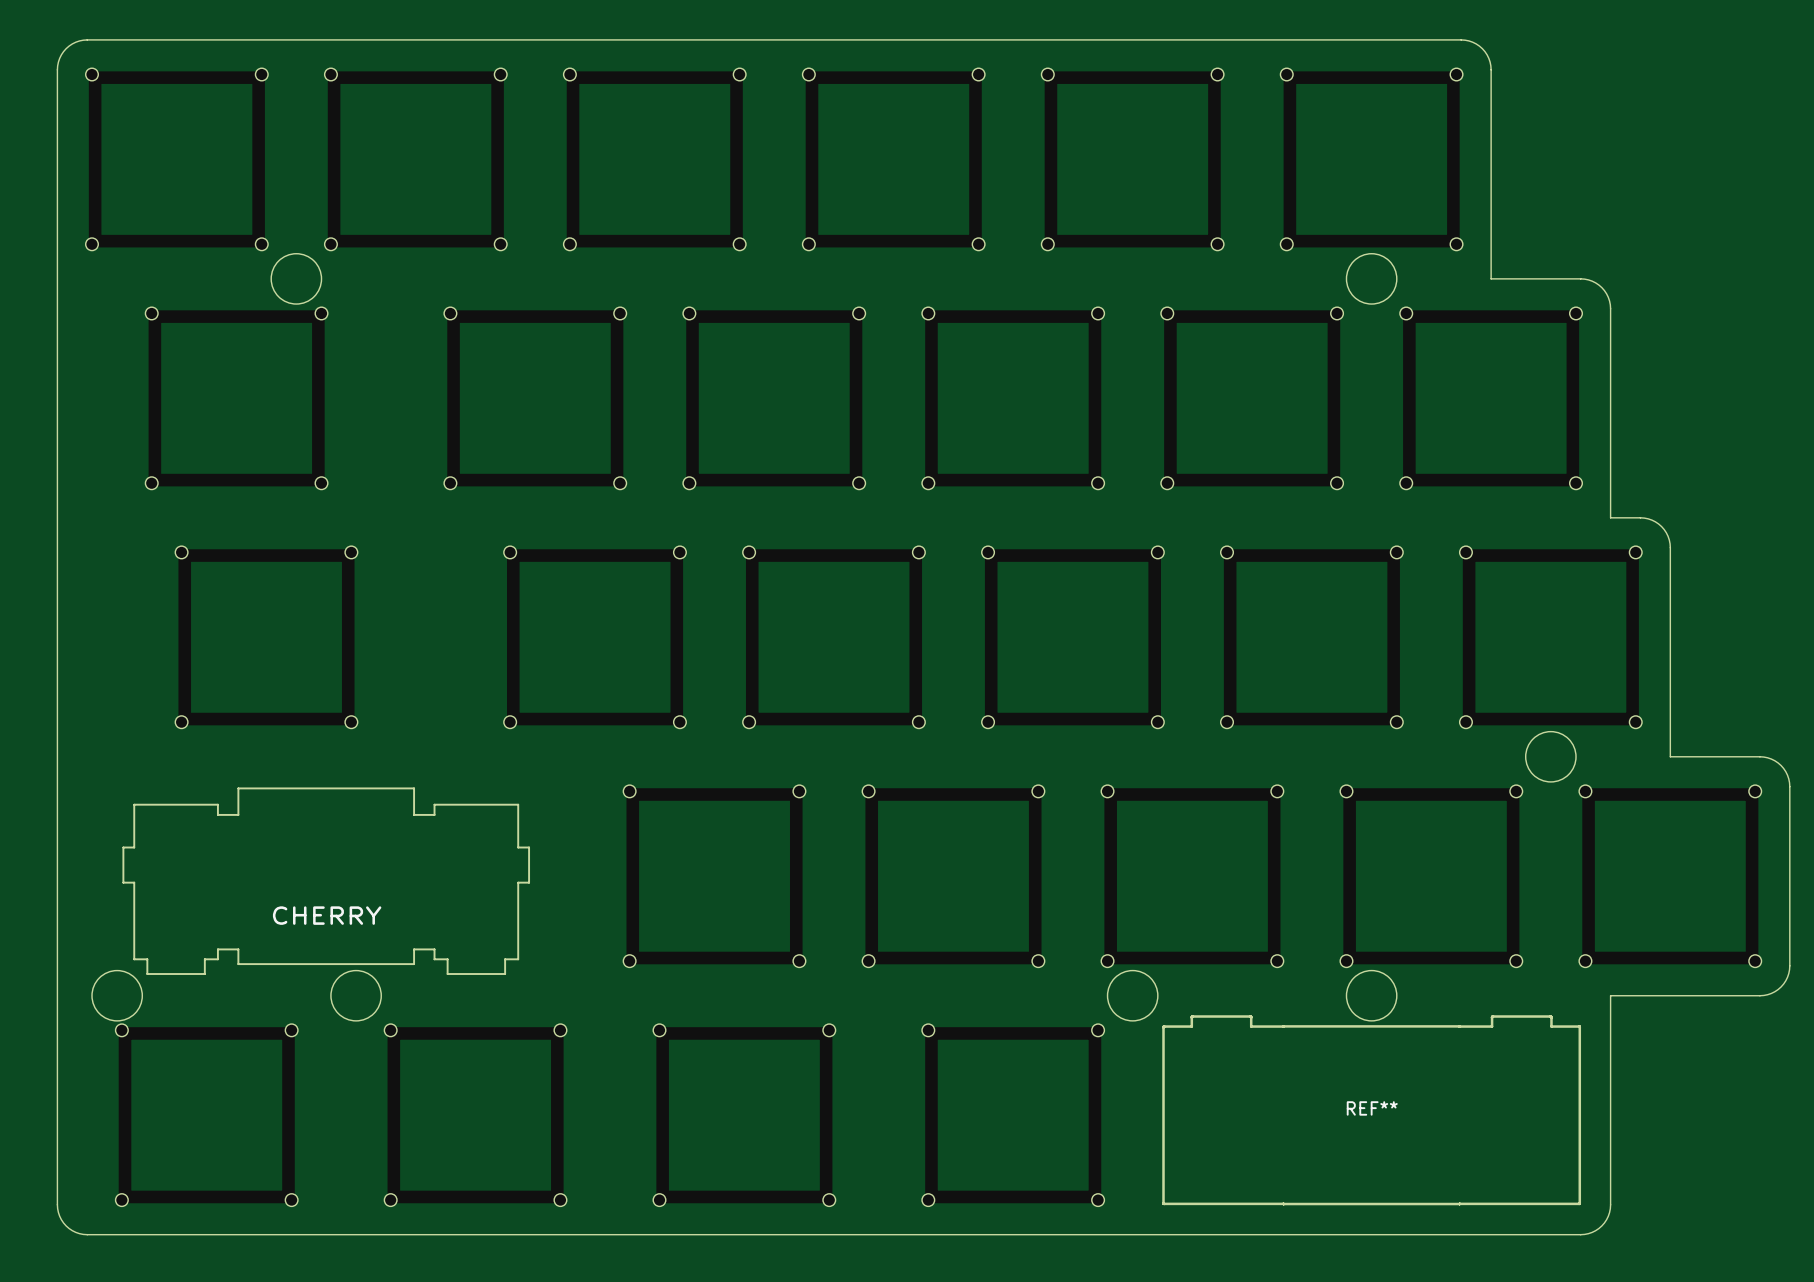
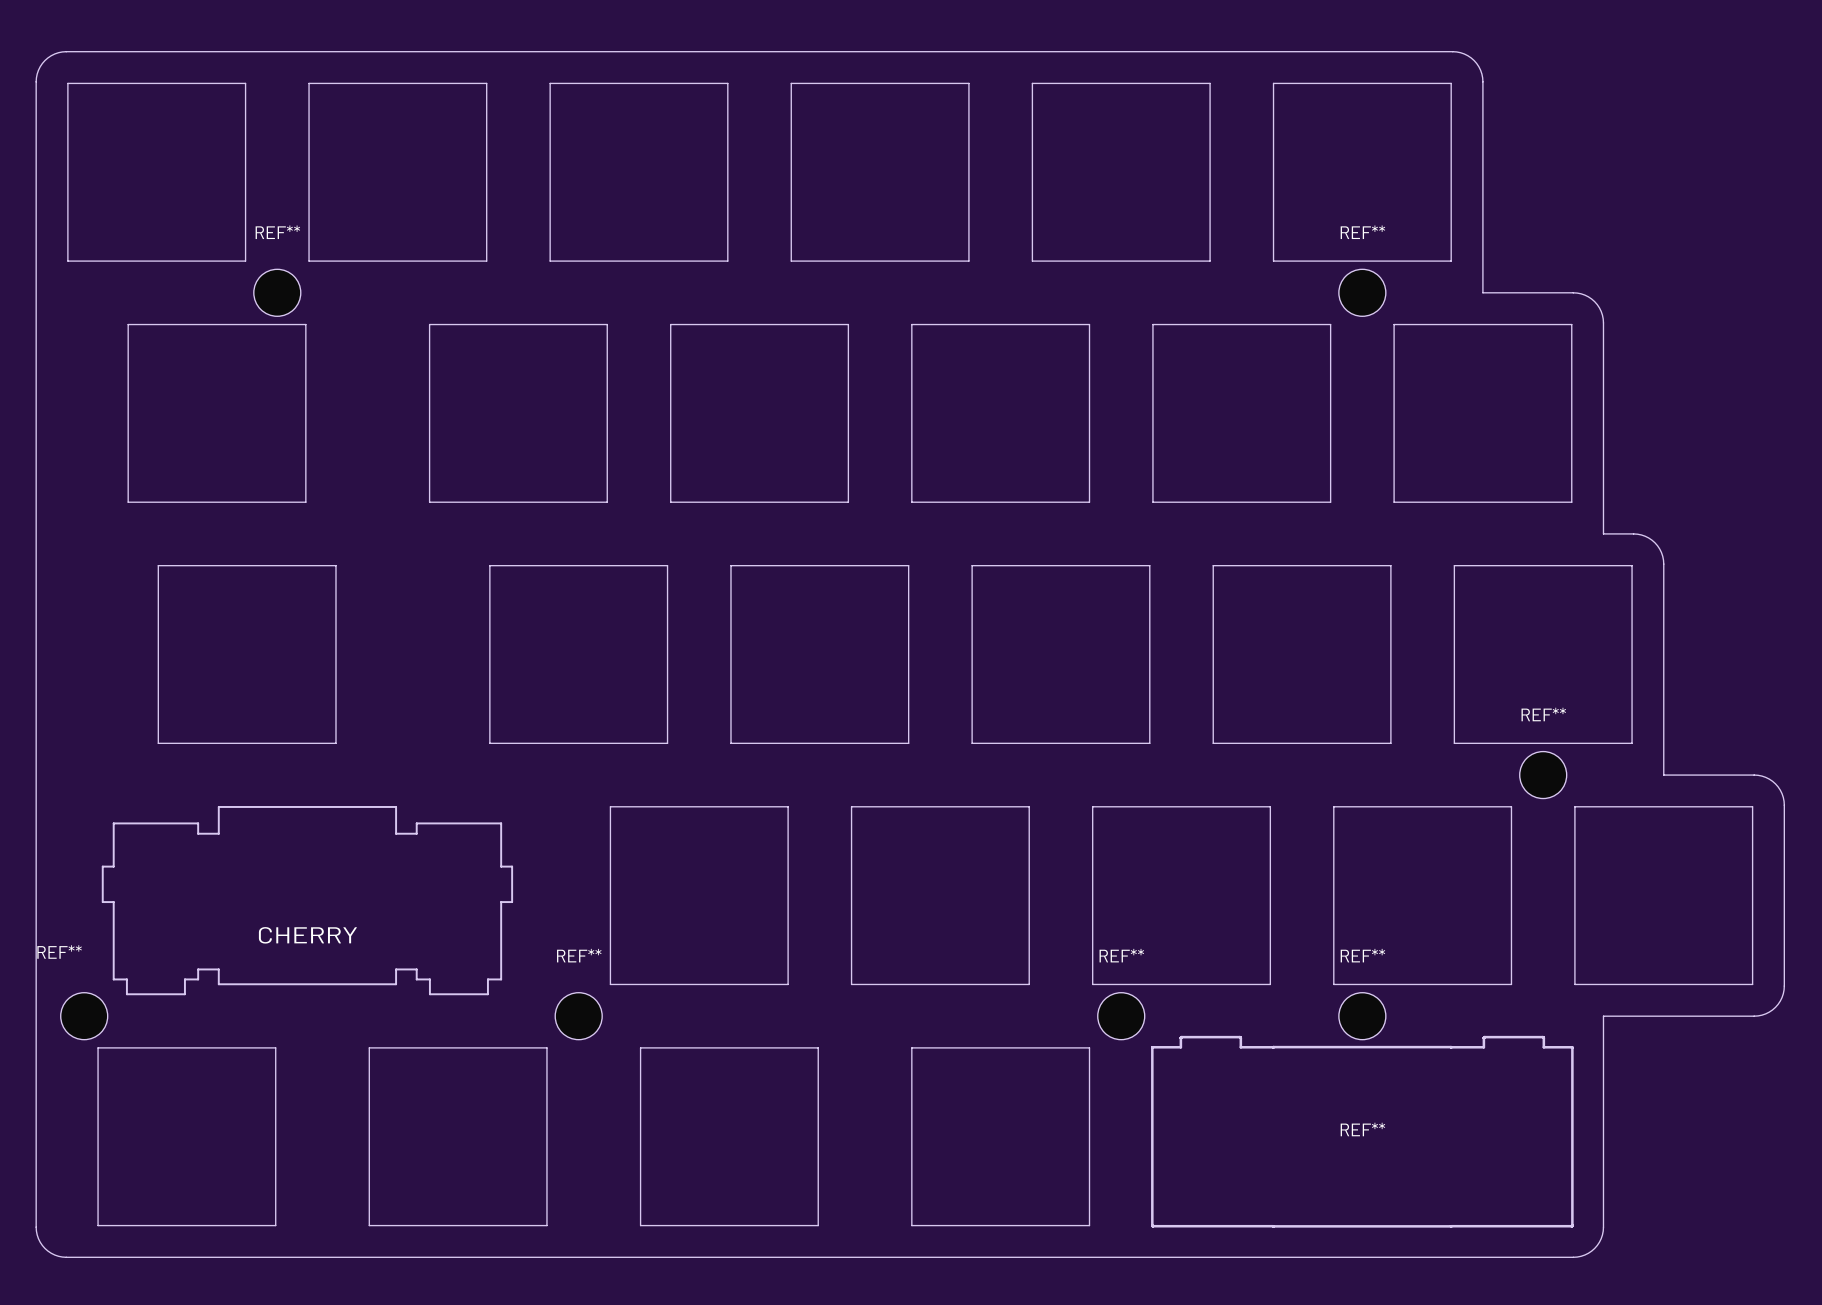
drawing: none -> [67, 82, 247, 262]
drawing: none -> [308, 82, 488, 262]
drawing: none -> [549, 82, 729, 262]
drawing: none -> [790, 82, 970, 262]
drawing: none -> [1031, 82, 1211, 262]
drawing: none -> [1272, 82, 1452, 262]
part: (176, 159) -> none
part: (415, 159) -> none
part: (654, 159) -> none
part: (893, 159) -> none
part: (1132, 159) -> none
part: (1371, 159) -> none
round board edge: [270, 253, 322, 305] -> none
round board edge: [1346, 253, 1398, 305] -> none
REF**: none -> (277, 292)
REF**: none -> (1362, 292)
drawing: none -> [127, 323, 307, 503]
drawing: none -> [428, 323, 608, 503]
drawing: none -> [670, 323, 850, 503]
drawing: none -> [911, 323, 1091, 503]
drawing: none -> [1152, 323, 1332, 503]
drawing: none -> [1393, 323, 1573, 503]
part: (236, 398) -> none
part: (535, 398) -> none
part: (774, 398) -> none
part: (1013, 398) -> none
part: (1252, 398) -> none
part: (1491, 398) -> none
drawing: none -> [157, 565, 337, 744]
drawing: none -> [489, 565, 669, 744]
drawing: none -> [730, 565, 910, 744]
drawing: none -> [971, 565, 1151, 744]
drawing: none -> [1212, 565, 1392, 744]
drawing: none -> [1453, 565, 1633, 744]
part: (266, 637) -> none
part: (595, 637) -> none
part: (834, 637) -> none
part: (1072, 637) -> none
part: (1311, 637) -> none
part: (1550, 637) -> none
round board edge: [1525, 731, 1577, 783] -> none
REF**: none -> (1543, 775)
drawing: none -> [609, 806, 789, 986]
drawing: none -> [850, 806, 1030, 986]
drawing: none -> [1092, 806, 1271, 986]
drawing: none -> [1333, 806, 1513, 986]
drawing: none -> [1574, 806, 1754, 986]
part: (714, 876) -> none
part: (953, 876) -> none
part: (1192, 876) -> none
part: (1431, 876) -> none
part: (1670, 876) -> none
round board edge: [91, 970, 143, 1022] -> none
round board edge: [330, 970, 382, 1022] -> none
round board edge: [1107, 970, 1159, 1022] -> none
round board edge: [1346, 970, 1398, 1022] -> none
REF**: none -> (84, 1016)
REF**: none -> (578, 1016)
REF**: none -> (1121, 1016)
REF**: none -> (1362, 1016)
drawing: none -> [97, 1047, 277, 1227]
drawing: none -> [368, 1047, 548, 1227]
drawing: none -> [639, 1047, 819, 1227]
drawing: none -> [911, 1047, 1091, 1227]
part: (206, 1115) -> none
part: (475, 1115) -> none
part: (744, 1115) -> none
part: (1013, 1115) -> none

